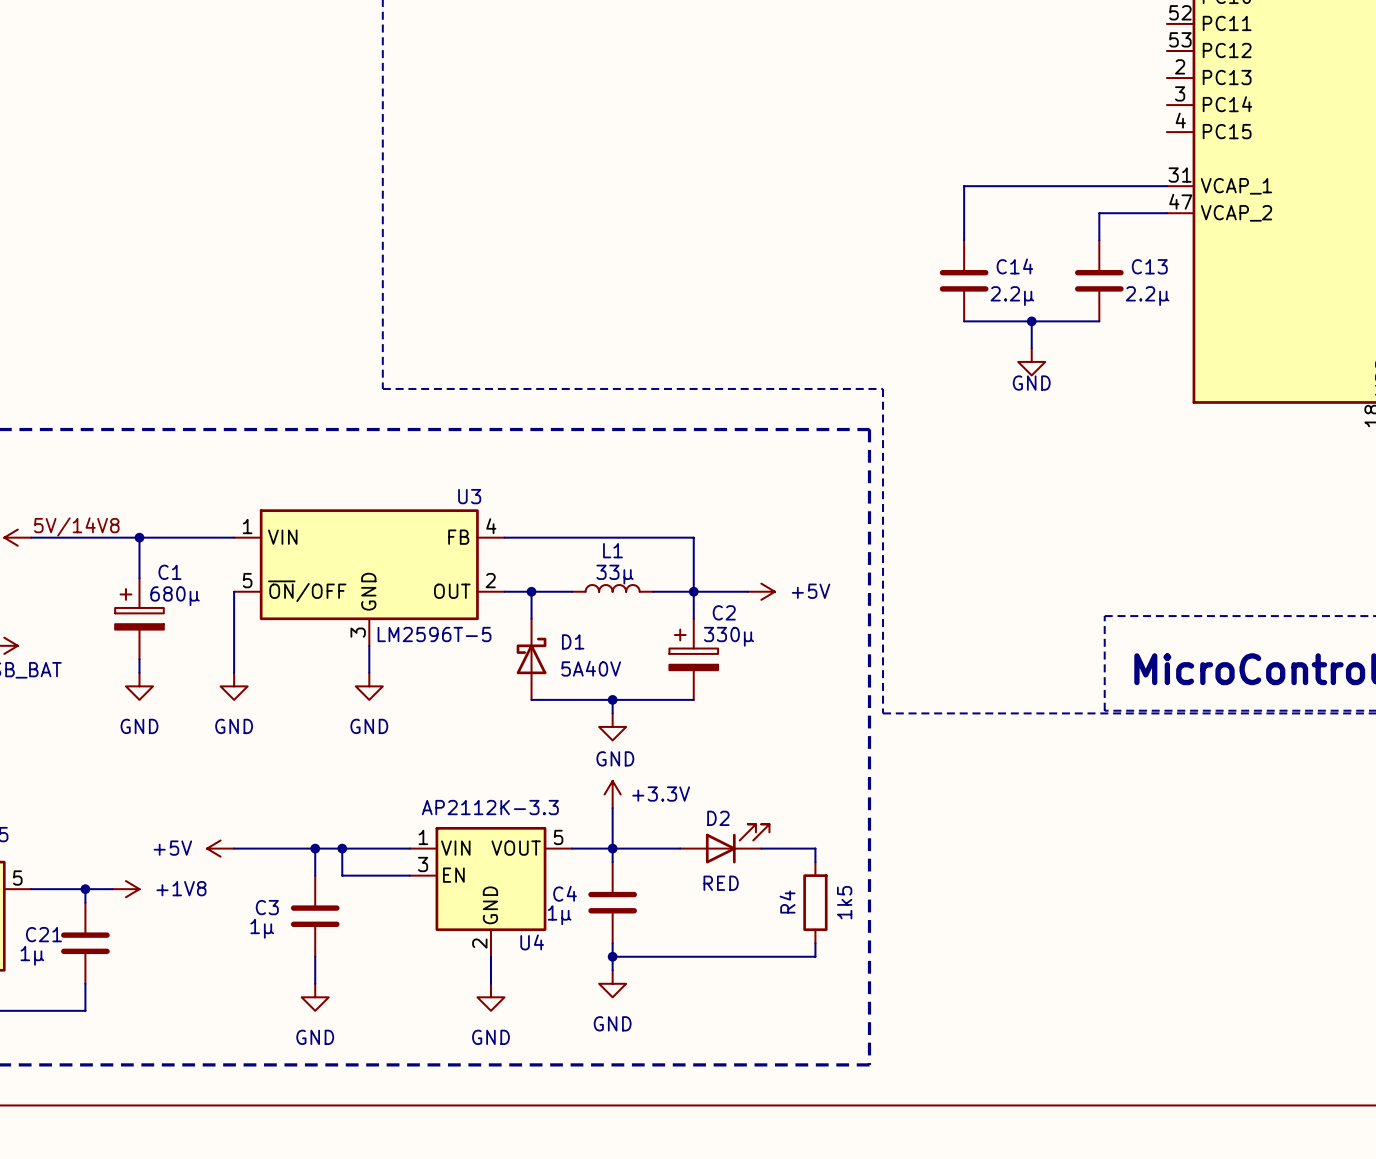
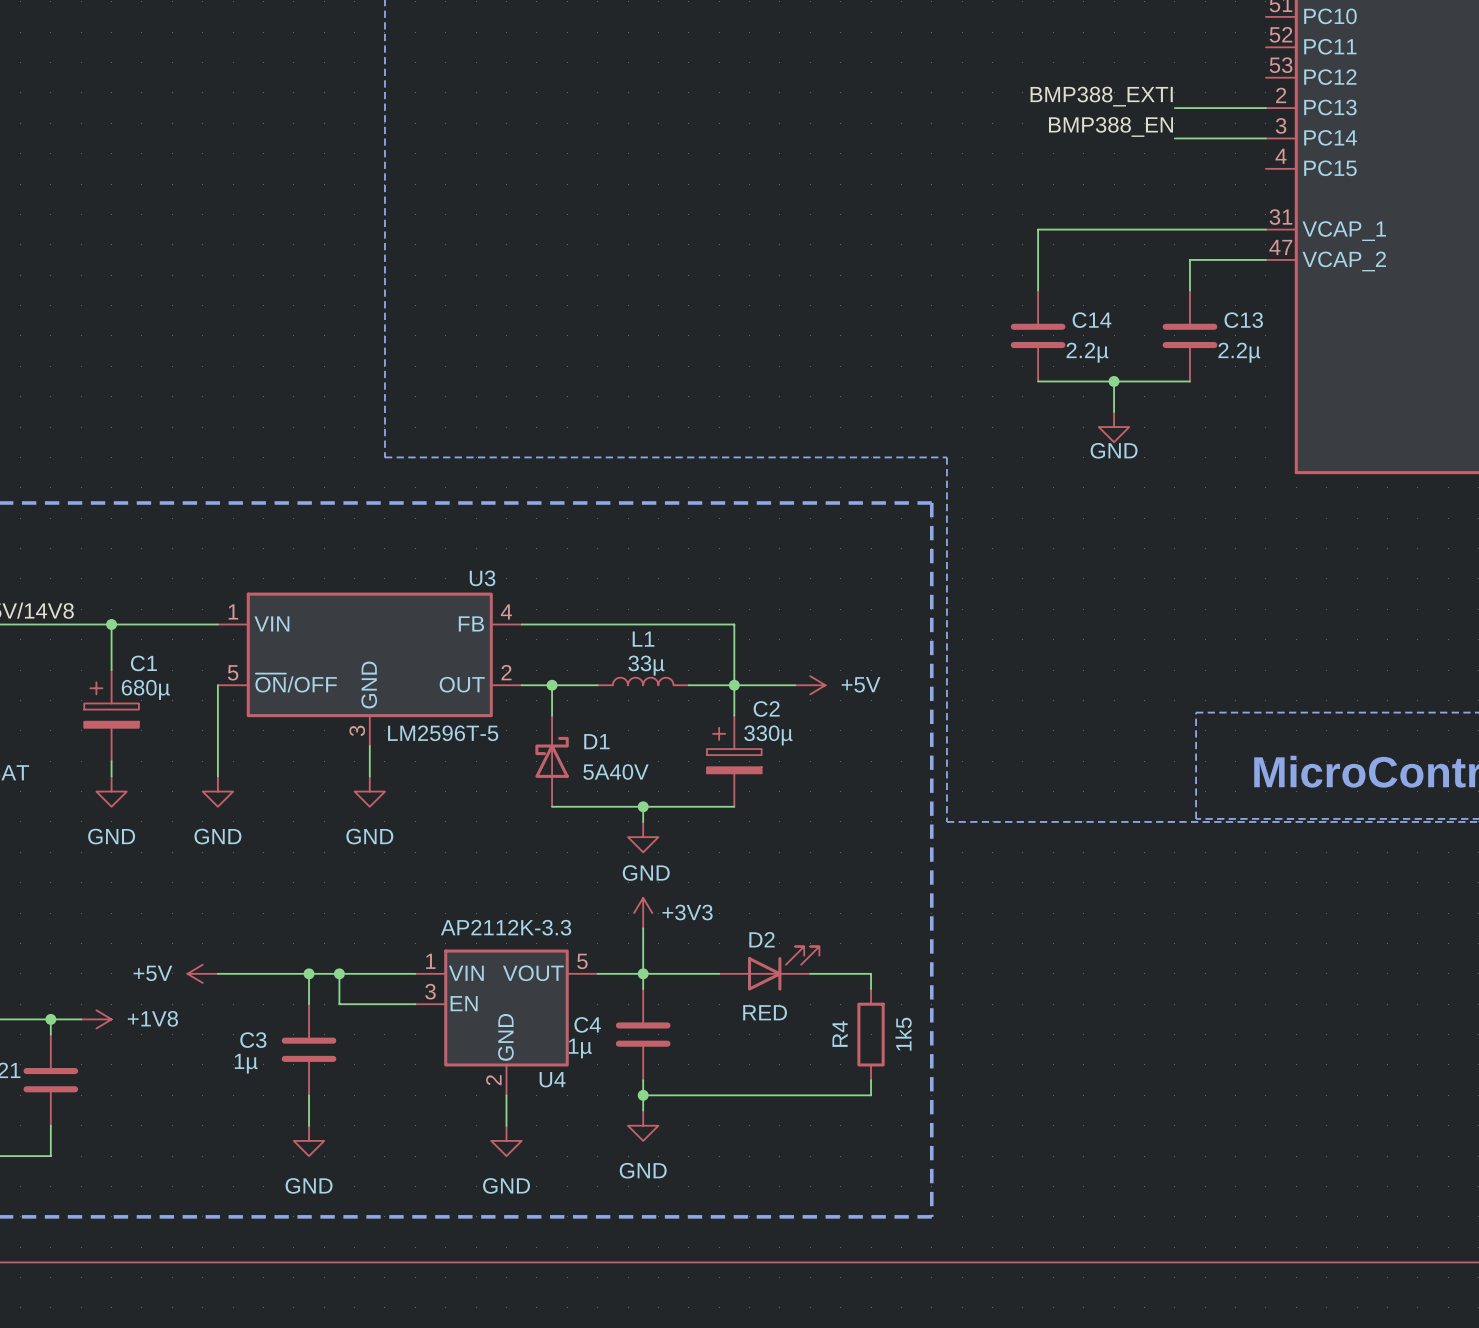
label: none -> BMP388_EXTI (1101, 96)
wire: none -> (1174, 108) (1265, 108)
label: none -> BMP388_EN (1110, 126)
wire: none -> (1174, 138) (1265, 138)
power symbol: +3.3V (612, 794) -> +3V3 (643, 913)

